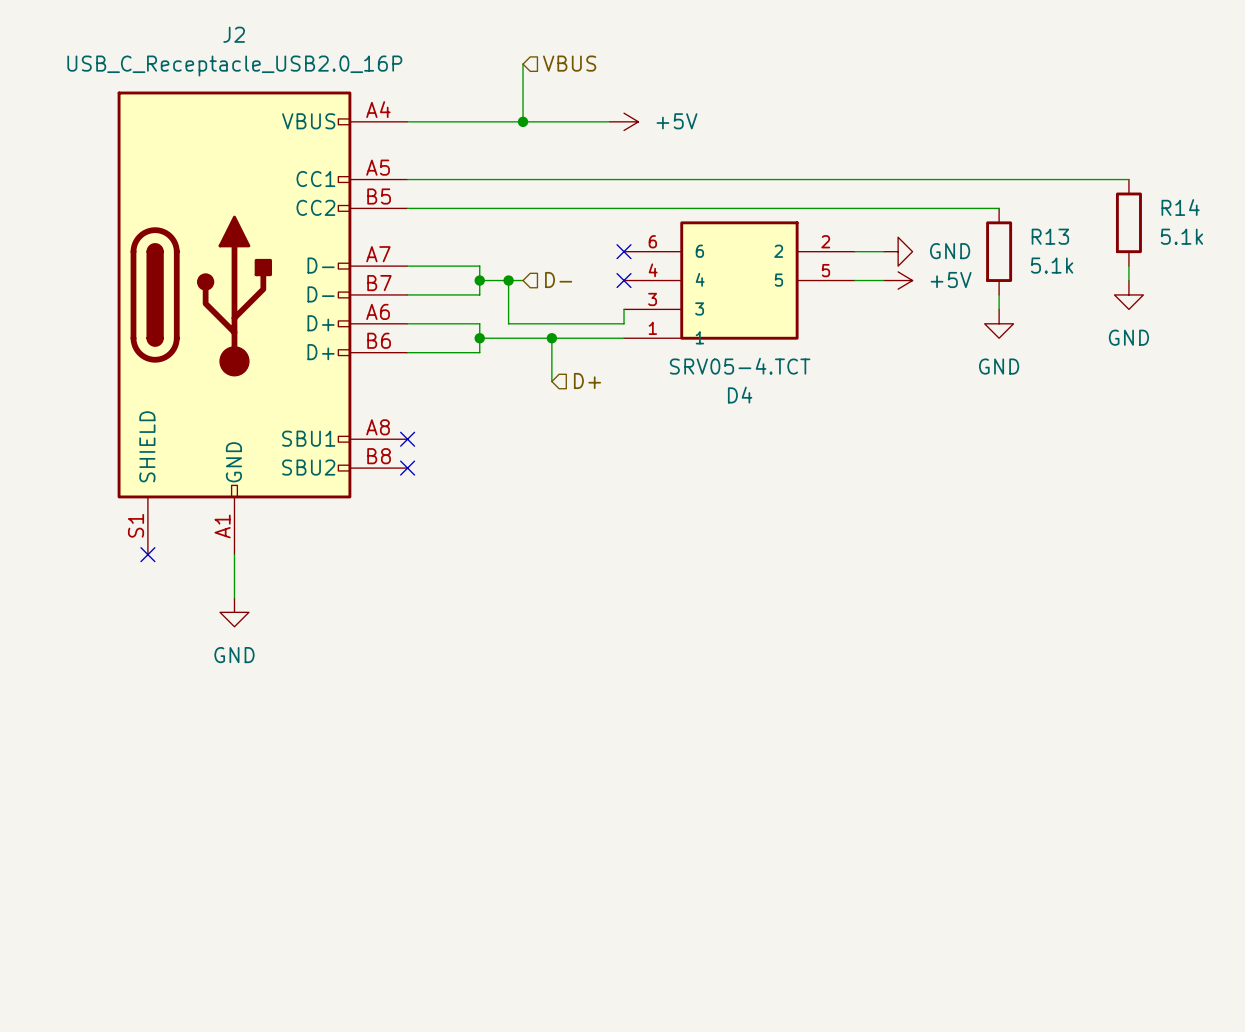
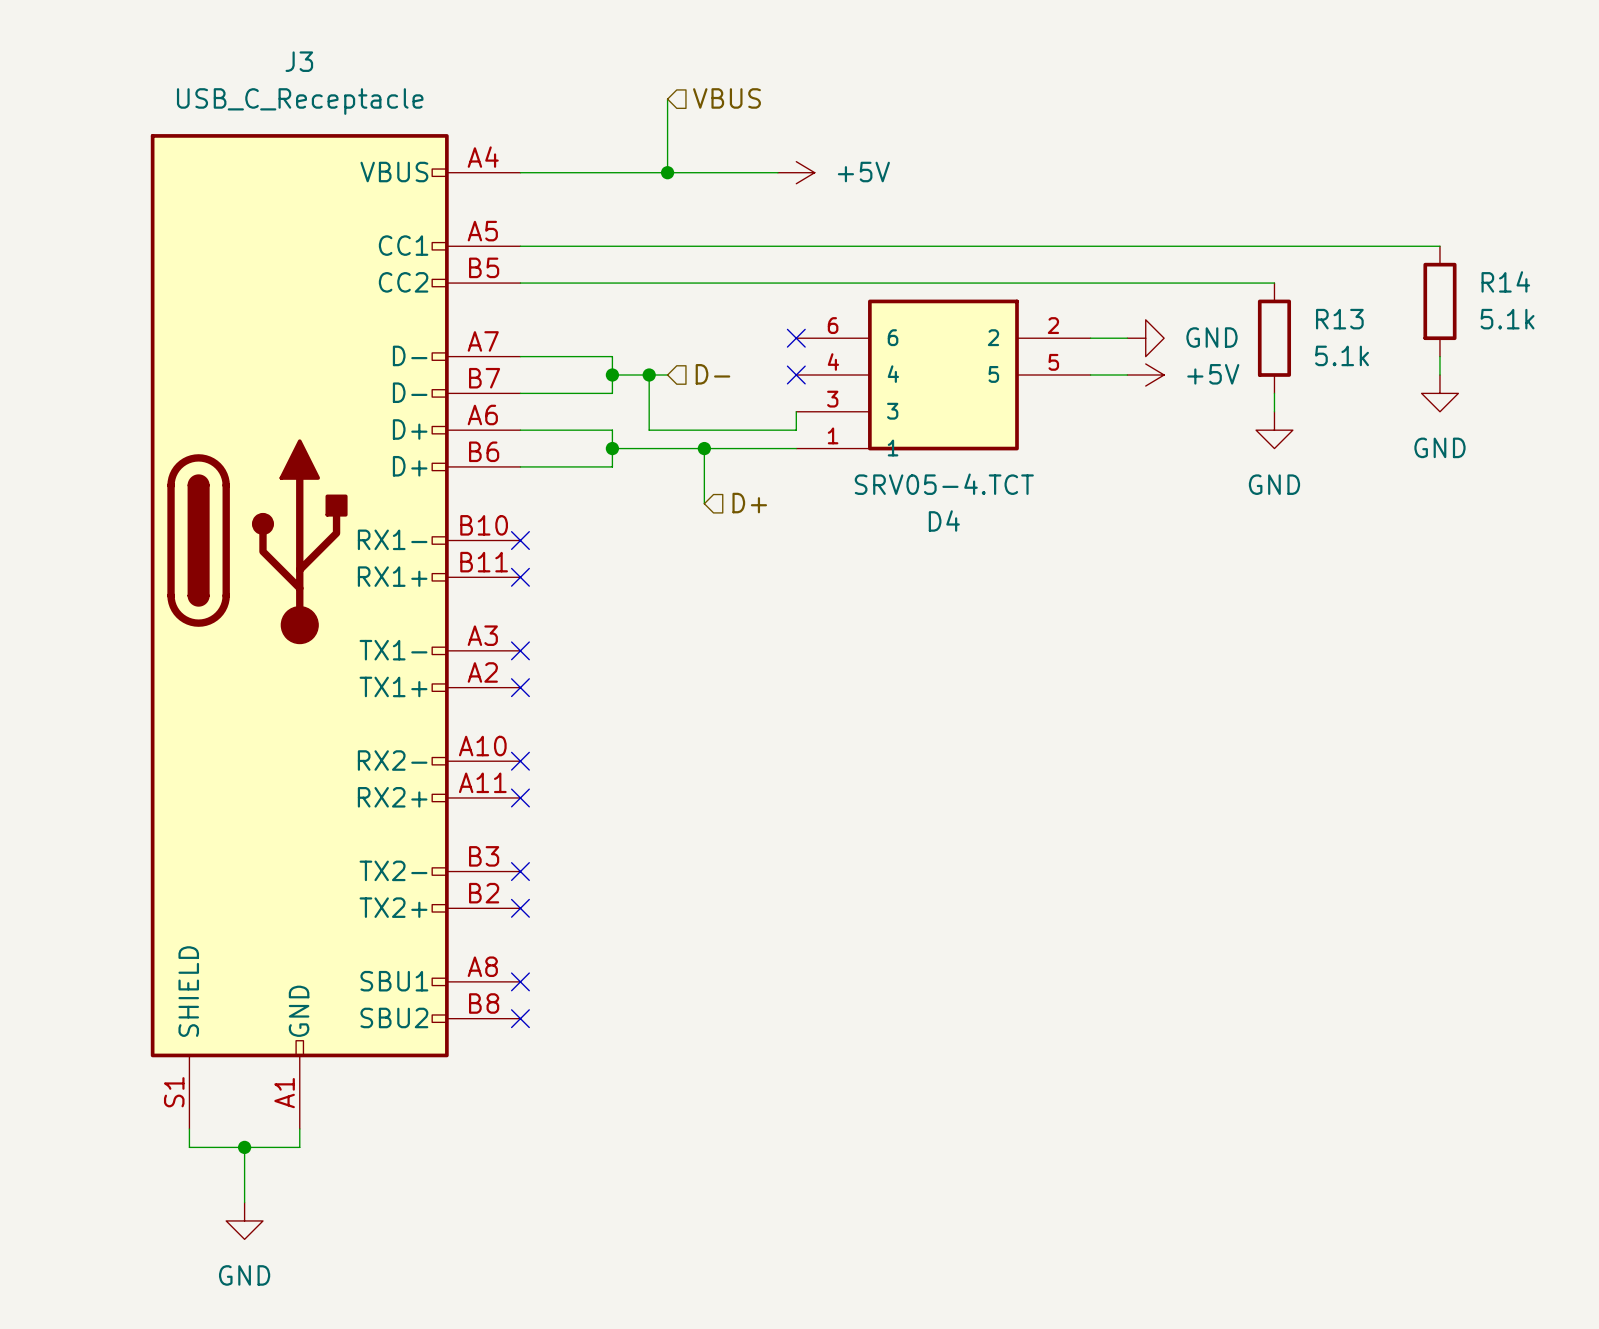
J2: USB_C_Receptacle_USB2.0_16P (262, 323) -> none
no-connect mark: none -> (520, 540)
no-connect mark: (407, 468) -> none
J3: none -> USB_C_Receptacle (335, 631)
no-connect mark: none -> (520, 650)
no-connect mark: none -> (520, 687)
no-connect mark: (147, 554) -> none
no-connect mark: none -> (520, 761)
power symbol: GND (234, 612) -> none
no-connect mark: none -> (520, 797)
no-connect mark: none -> (520, 871)
no-connect mark: none -> (520, 908)
no-connect mark: none -> (520, 981)
no-connect mark: none -> (520, 1018)
wire: none -> (189, 1129) (189, 1147) (299, 1147) (299, 1129)
wire: none -> (244, 1147) (244, 1202)
junction: none -> (244, 1147)
power symbol: none -> GND (244, 1220)

